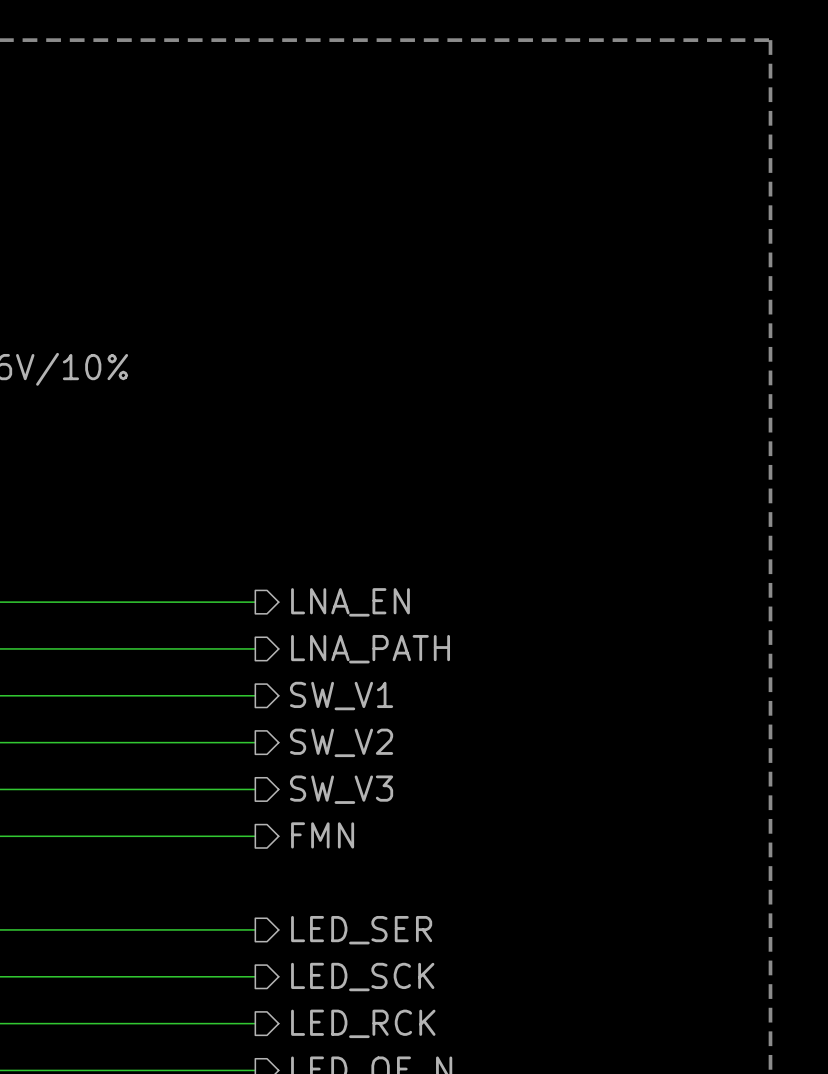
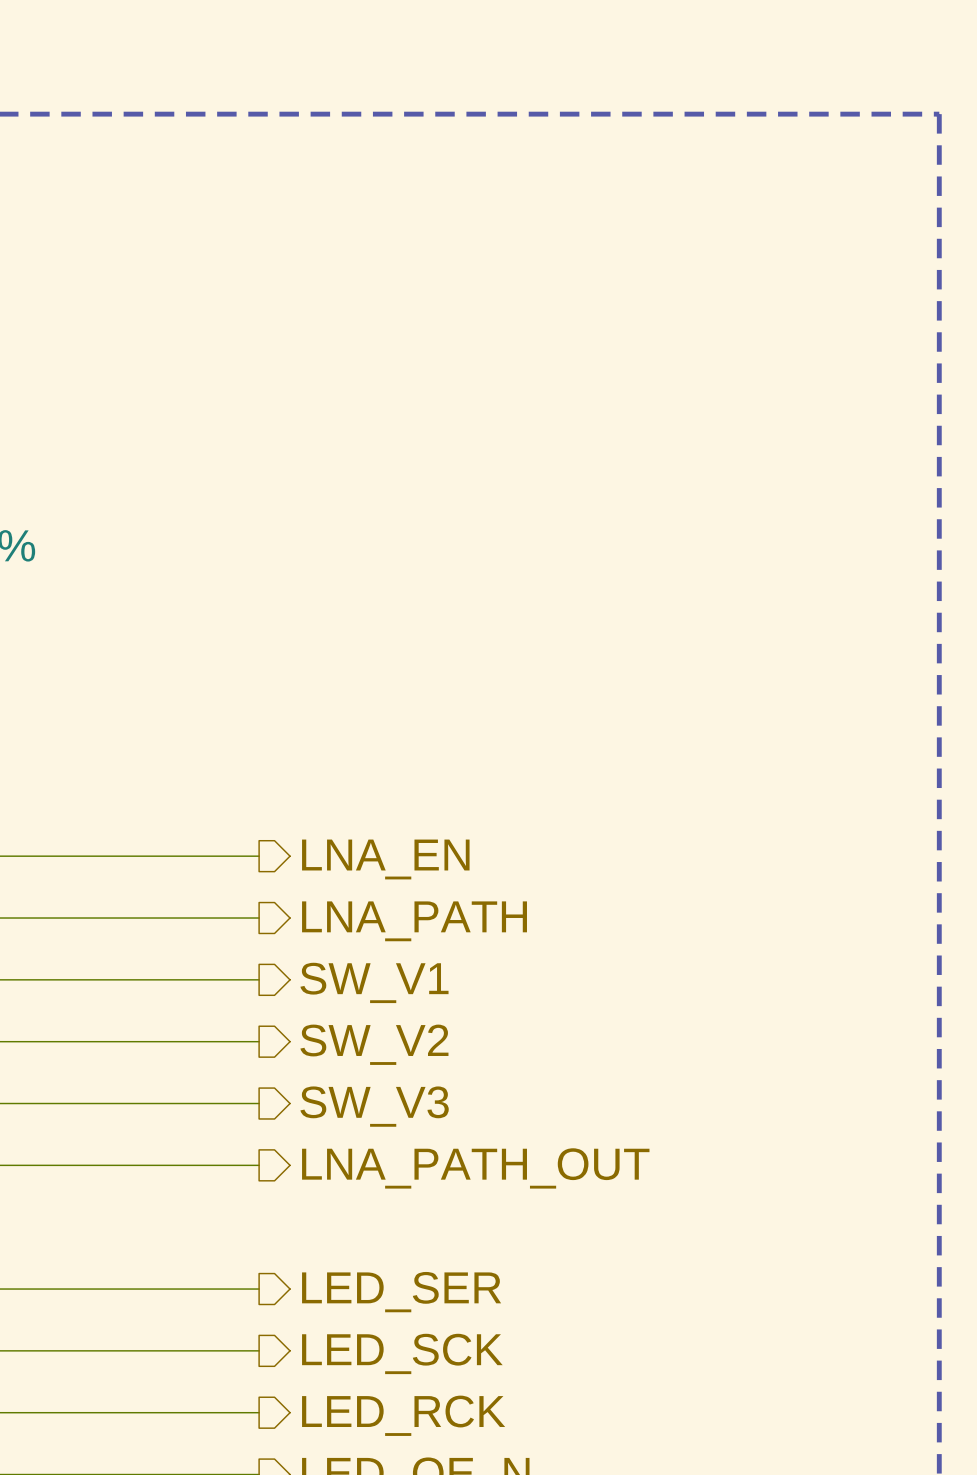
hierarchical label: FMN (322, 835) -> LNA_PATH_OUT (475, 1168)

